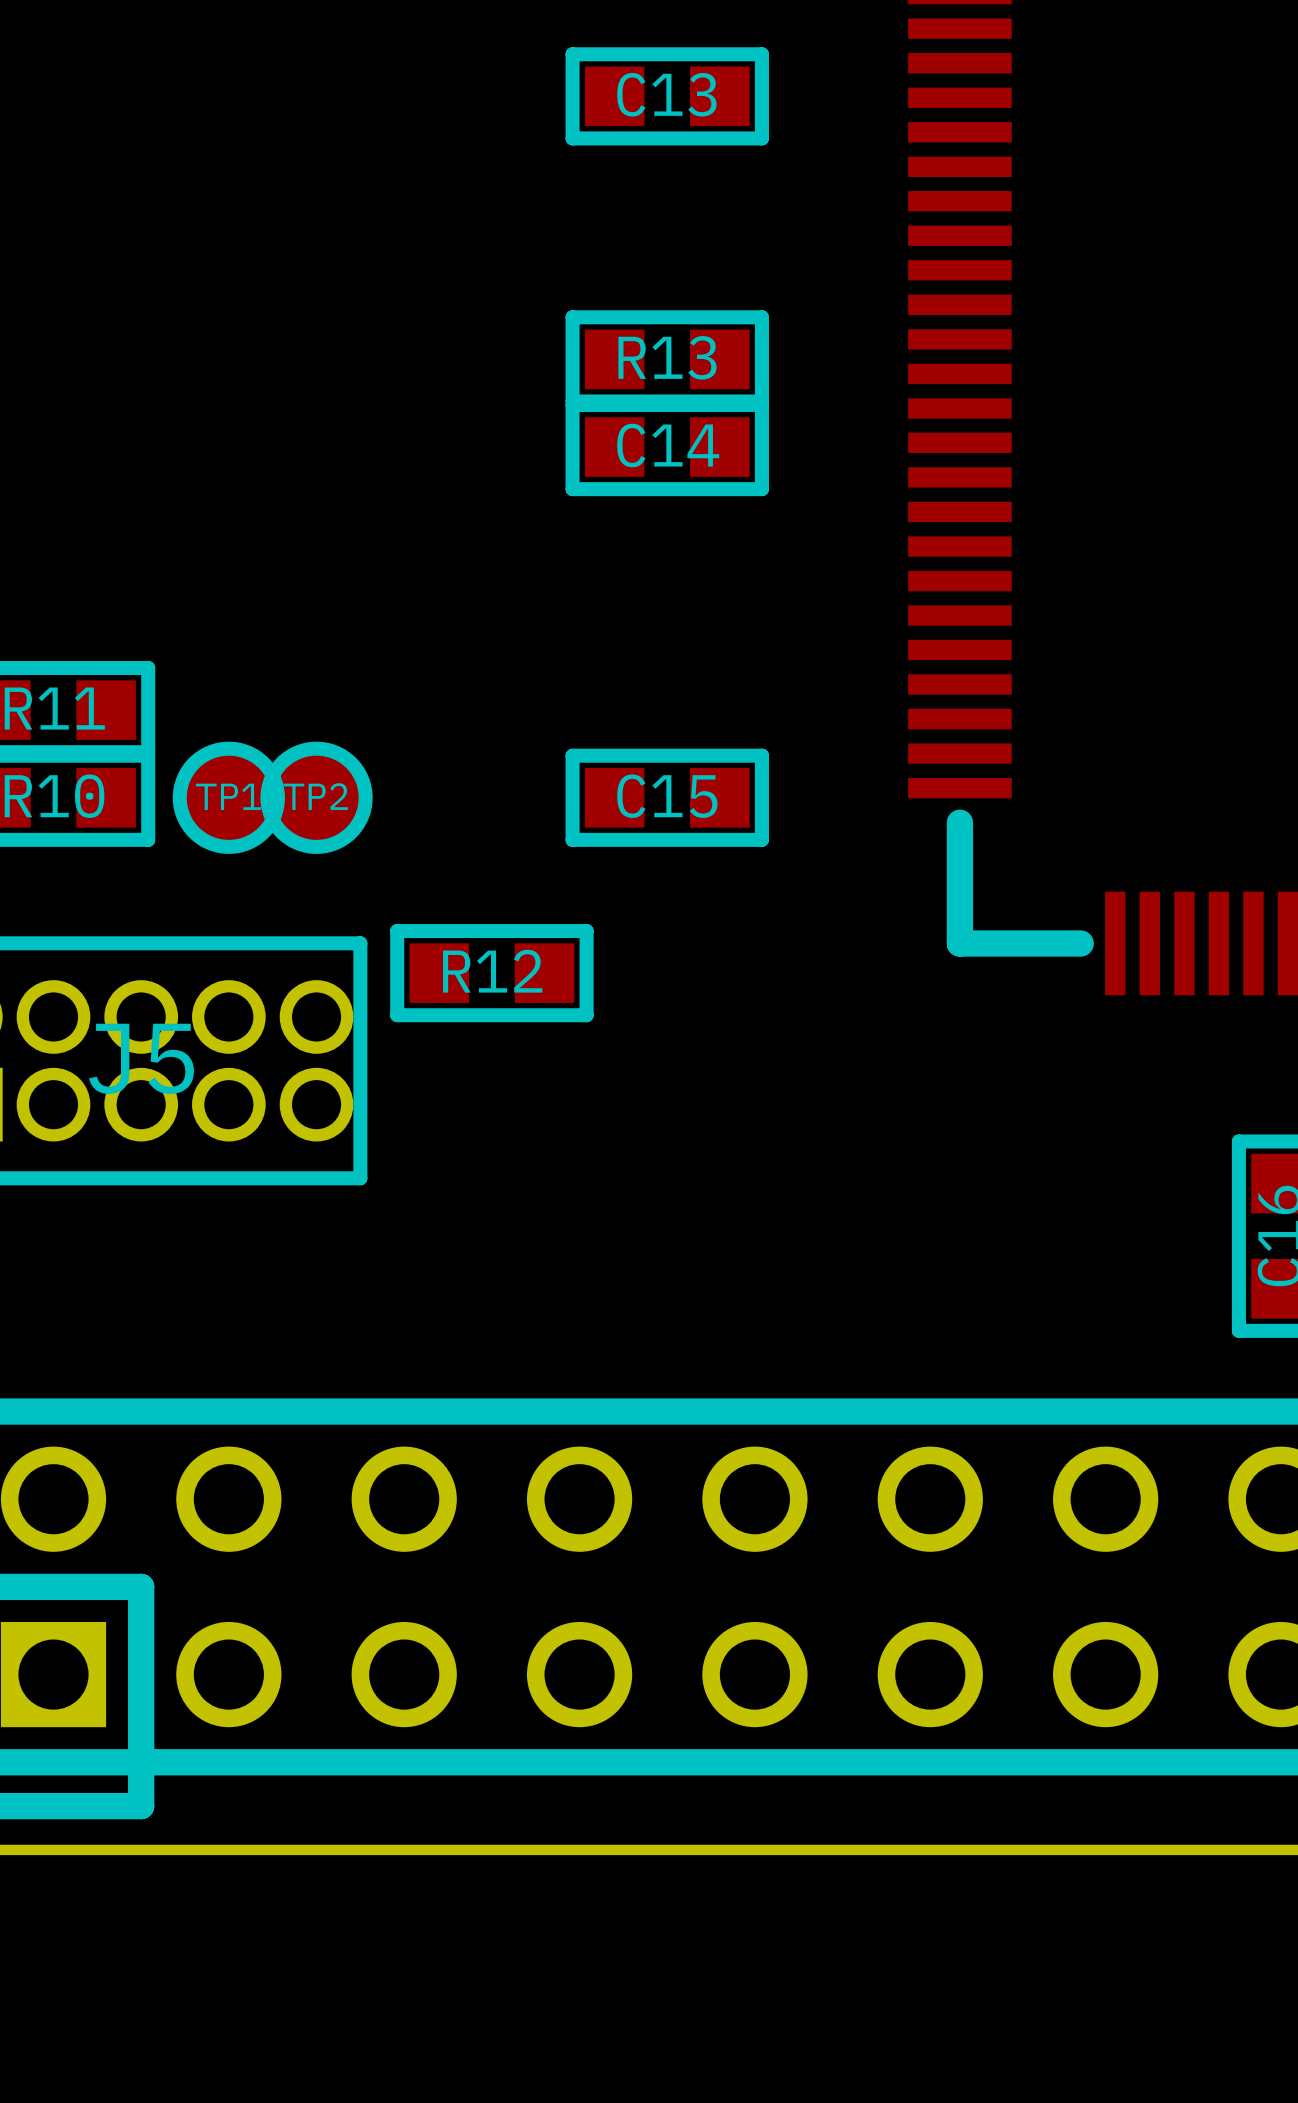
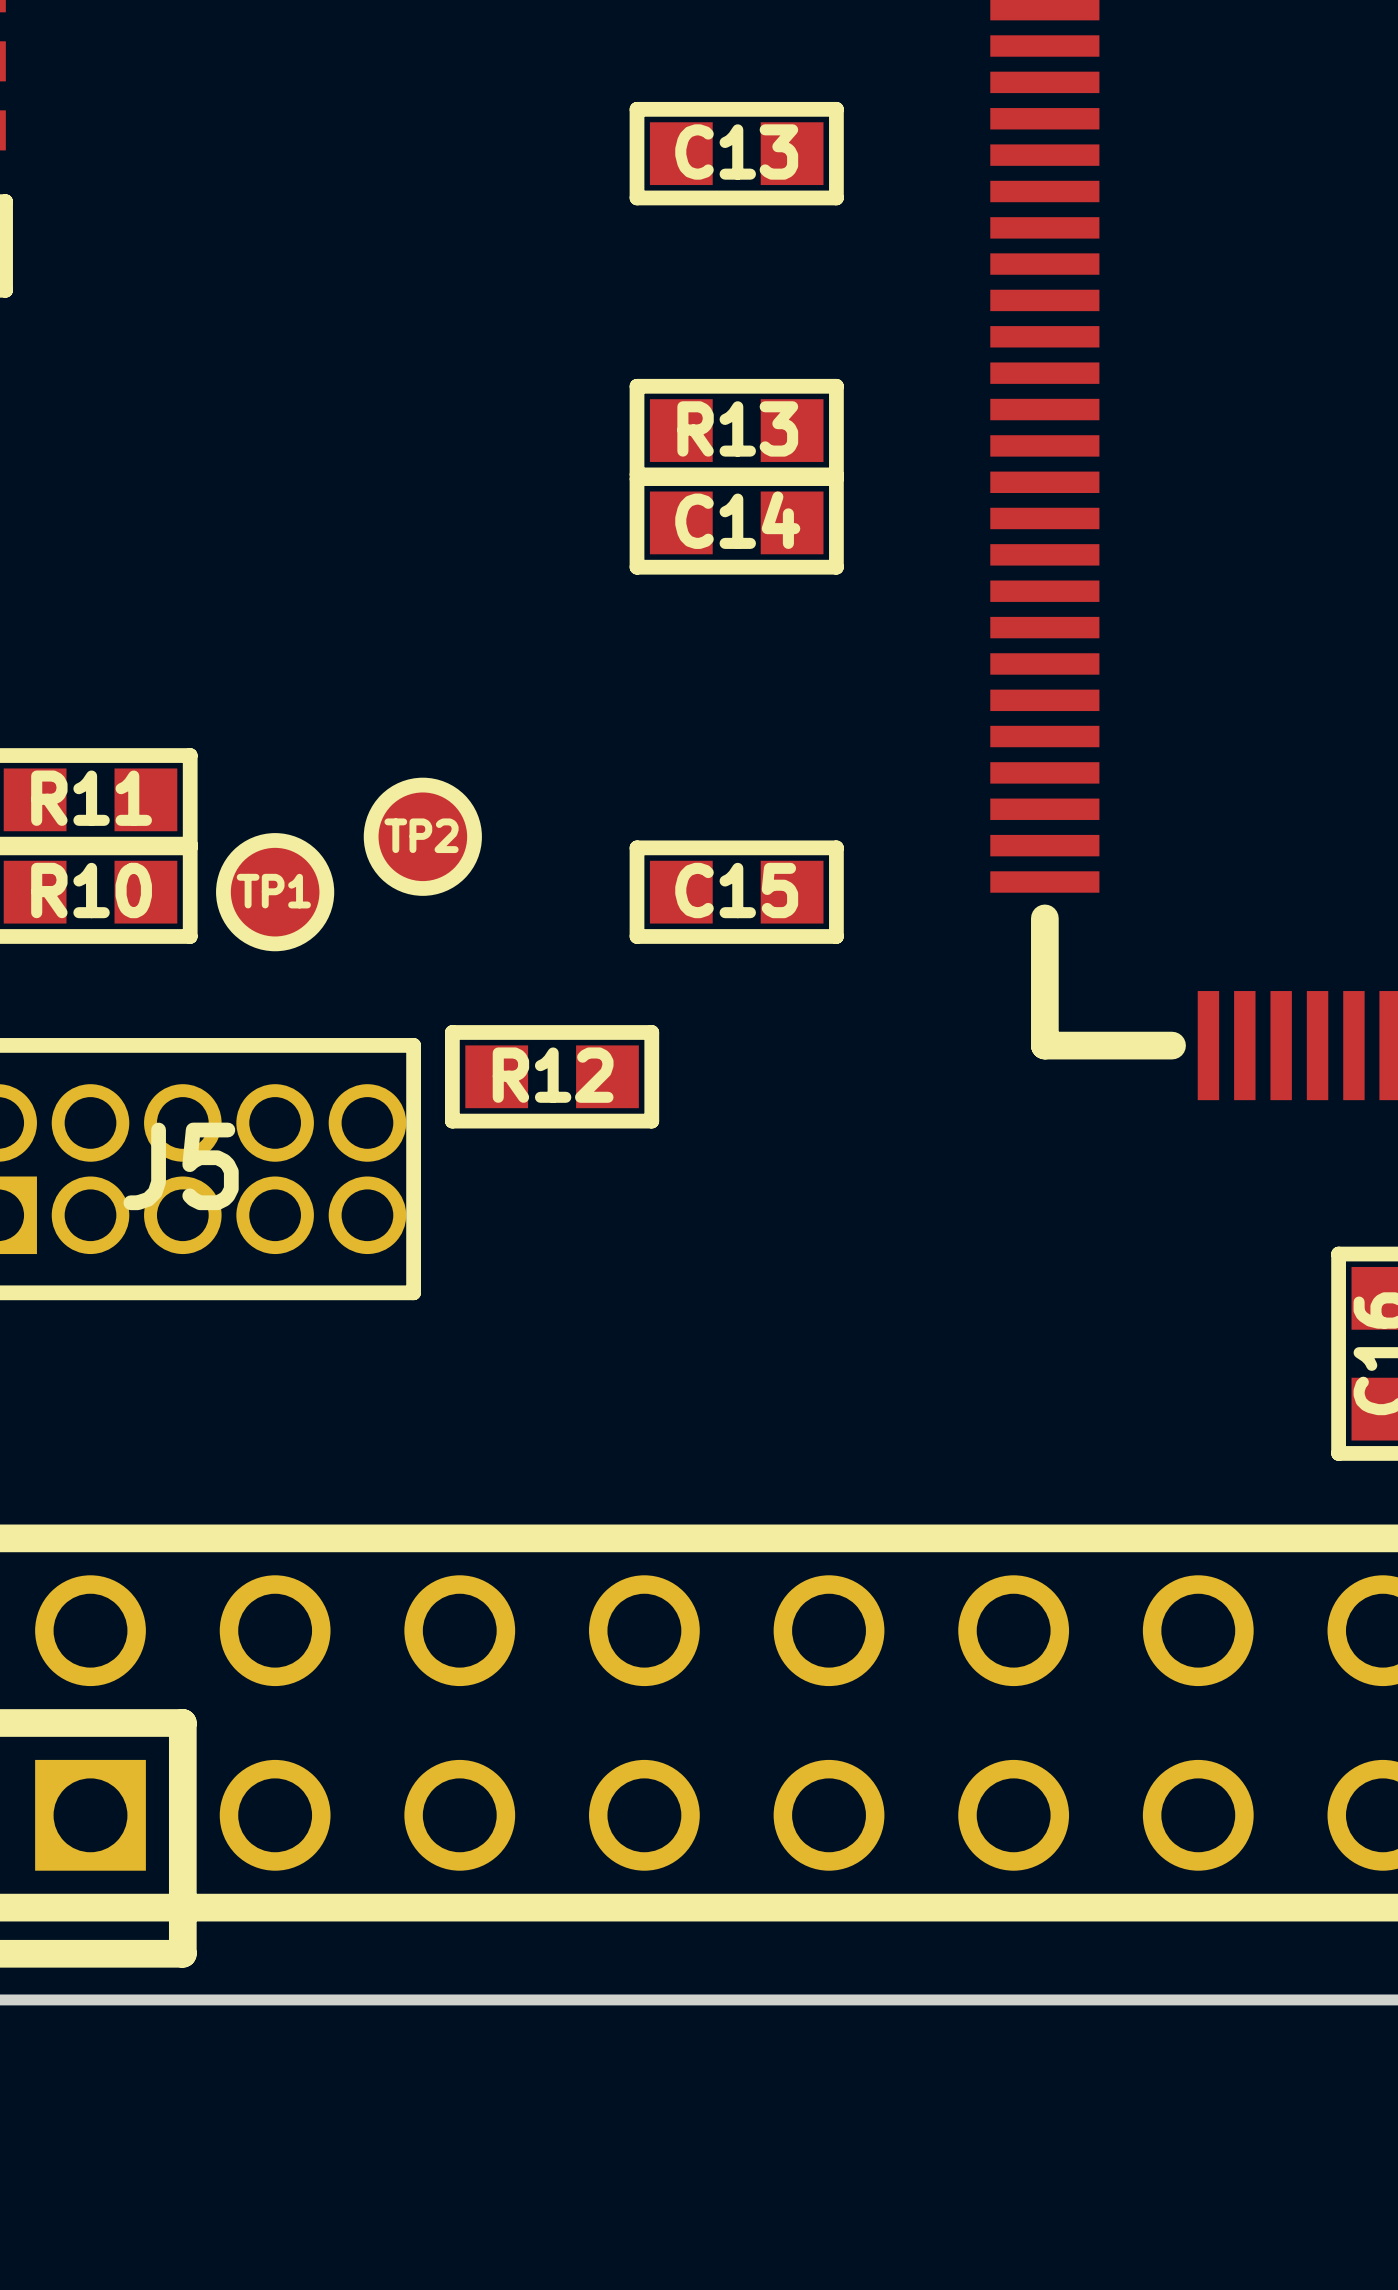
TP2 position: (316, 797) -> (422, 836)

